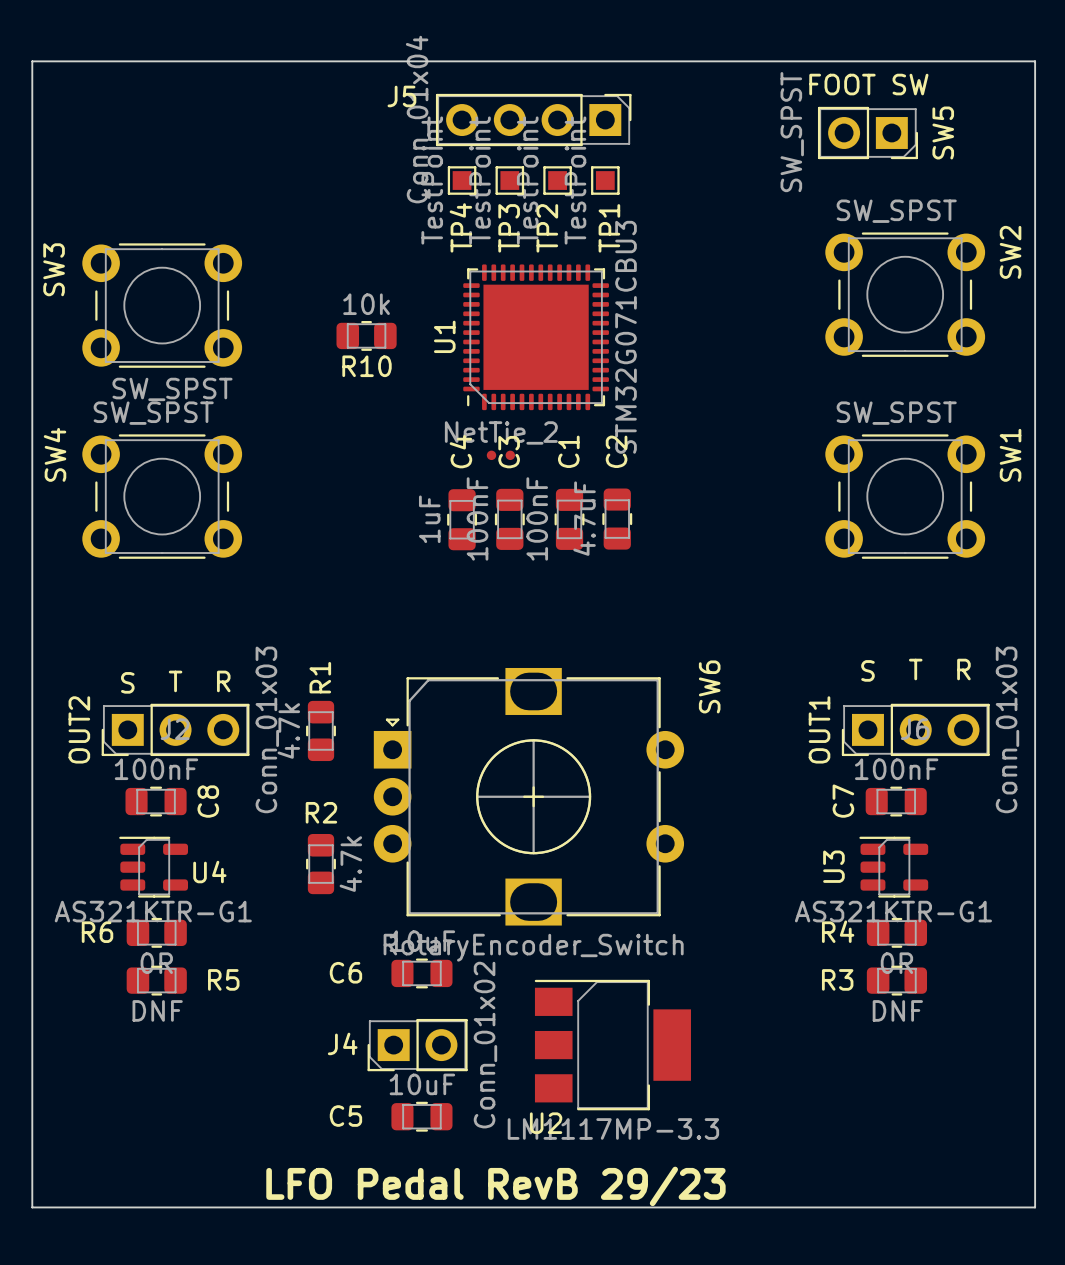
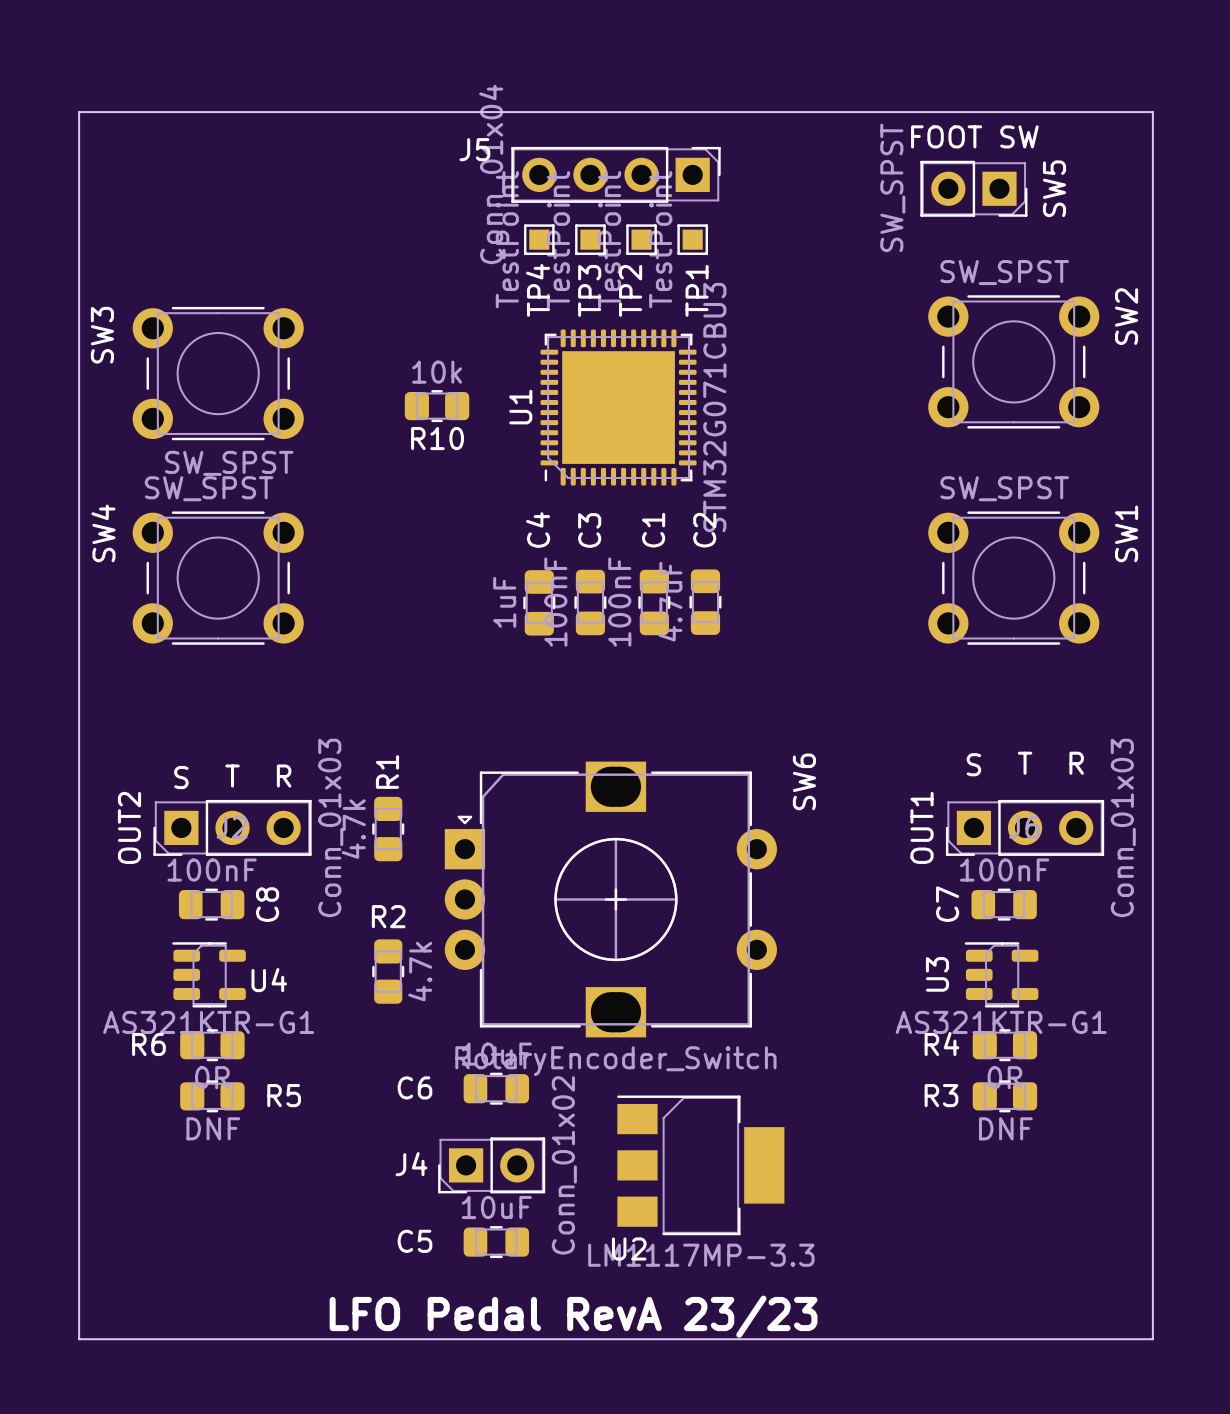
part: NetTie_2 (500, 455) -> none
text: LFO Pedal RevB 29/23 (495, 1186) -> LFO Pedal RevA 23/23 (573, 1316)

